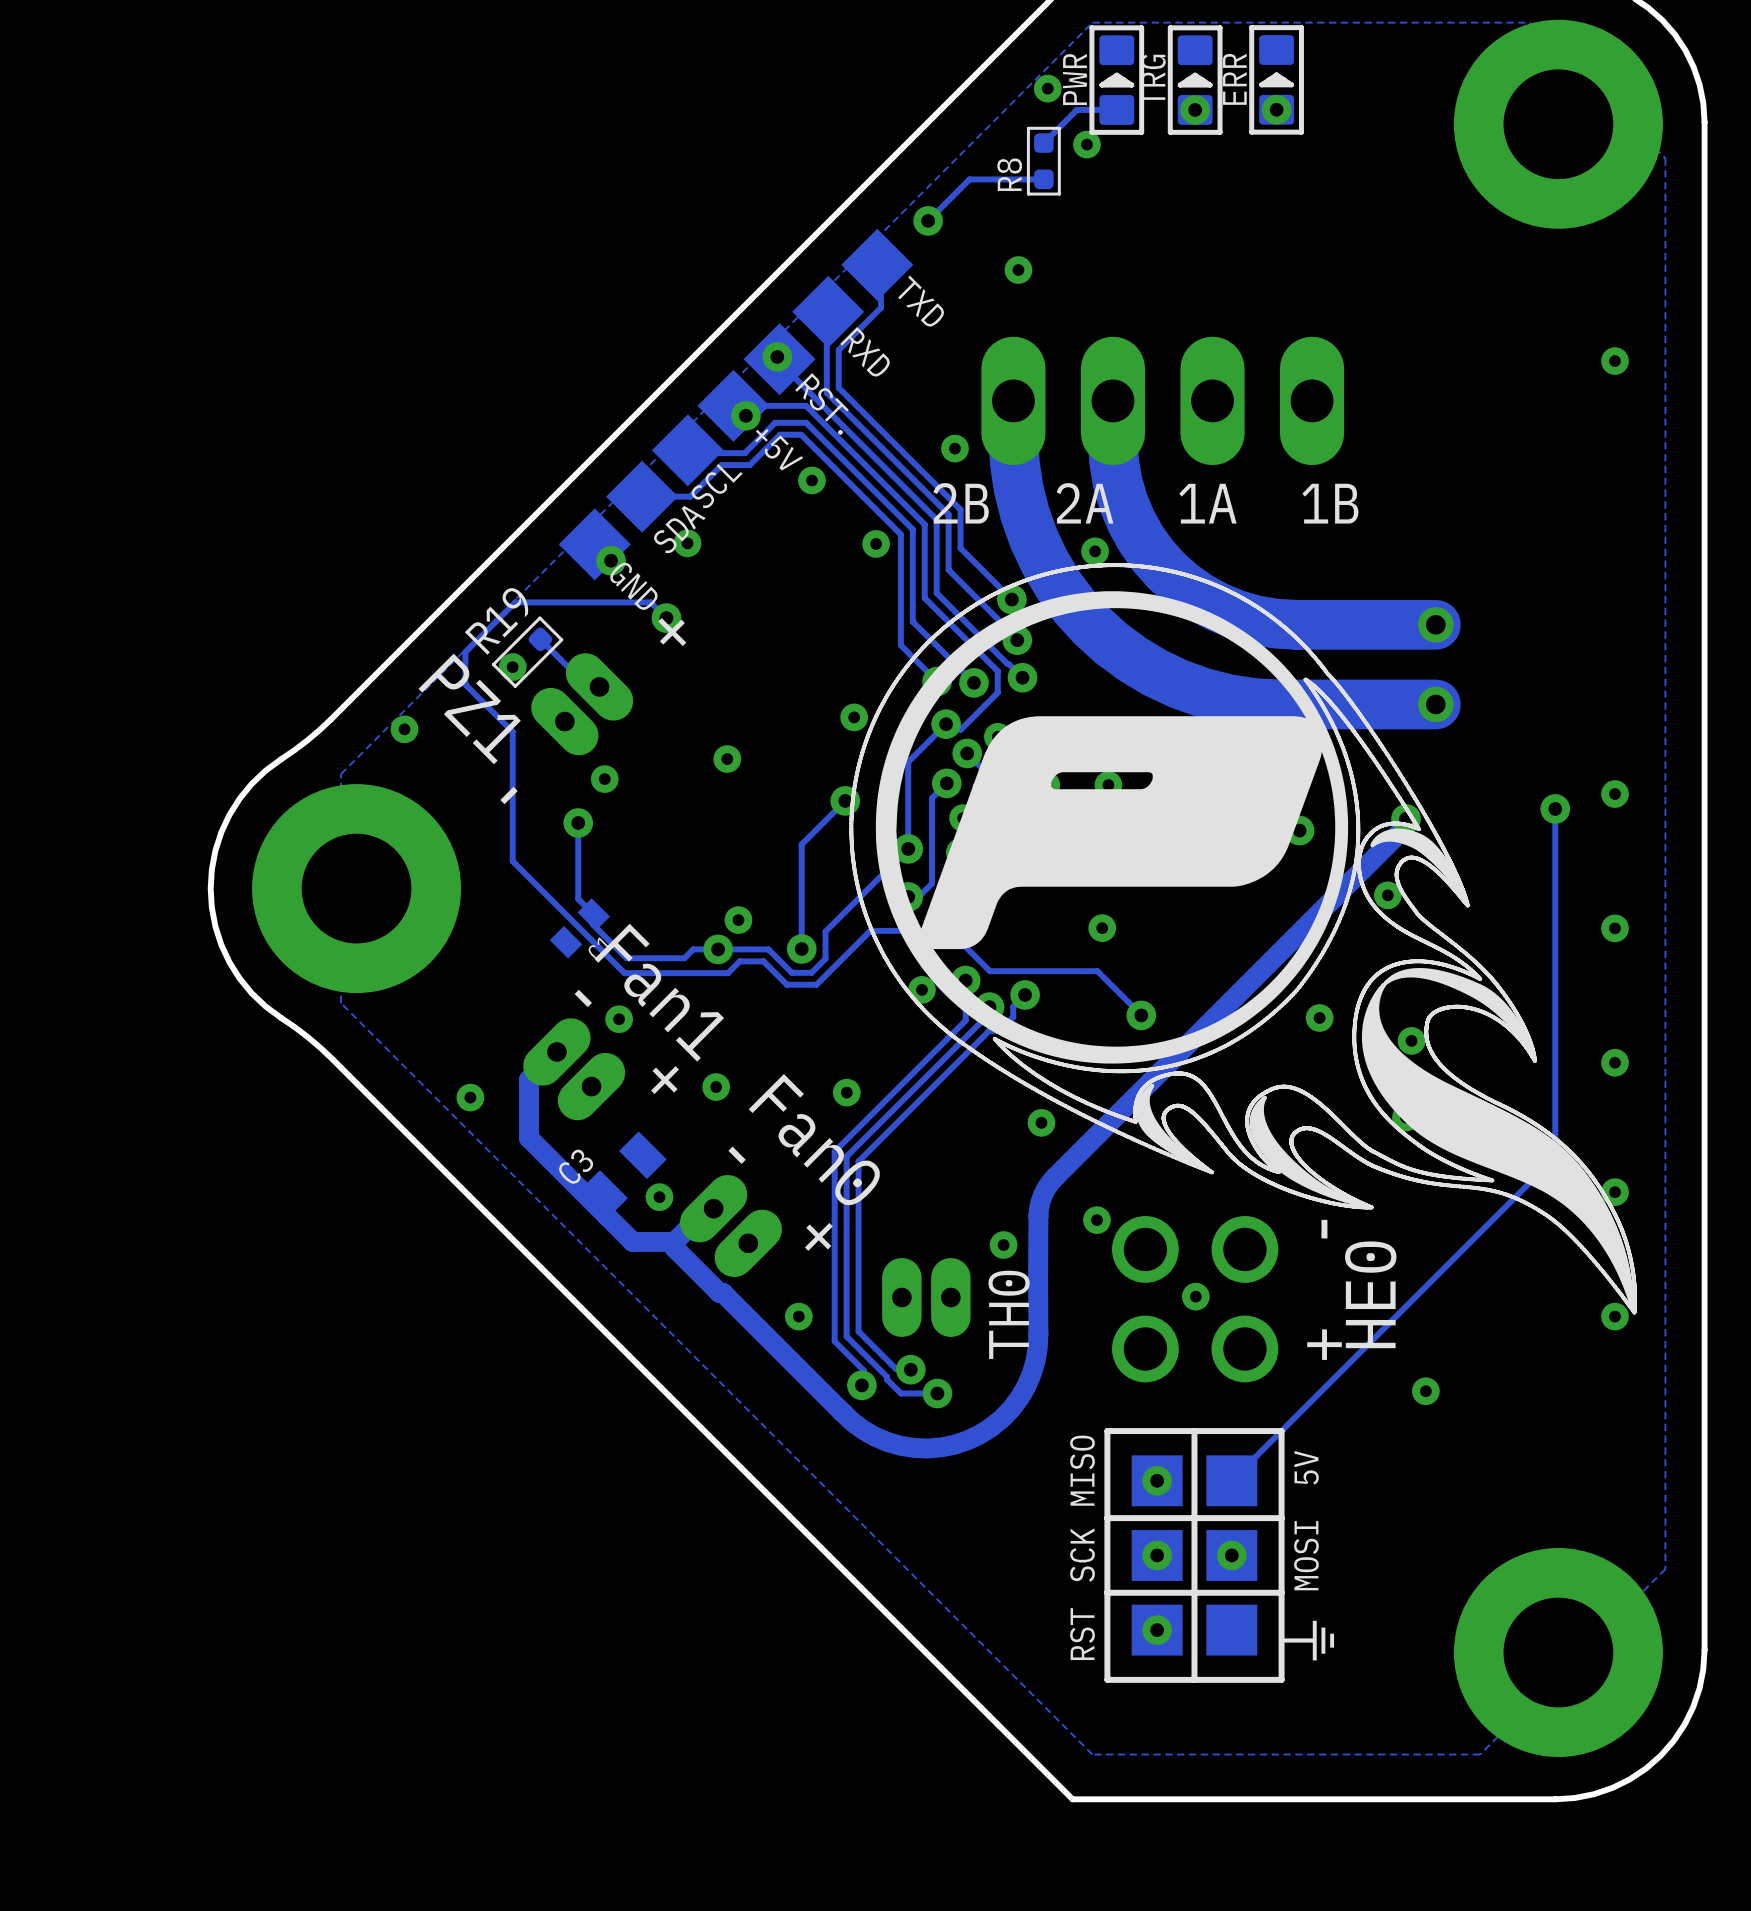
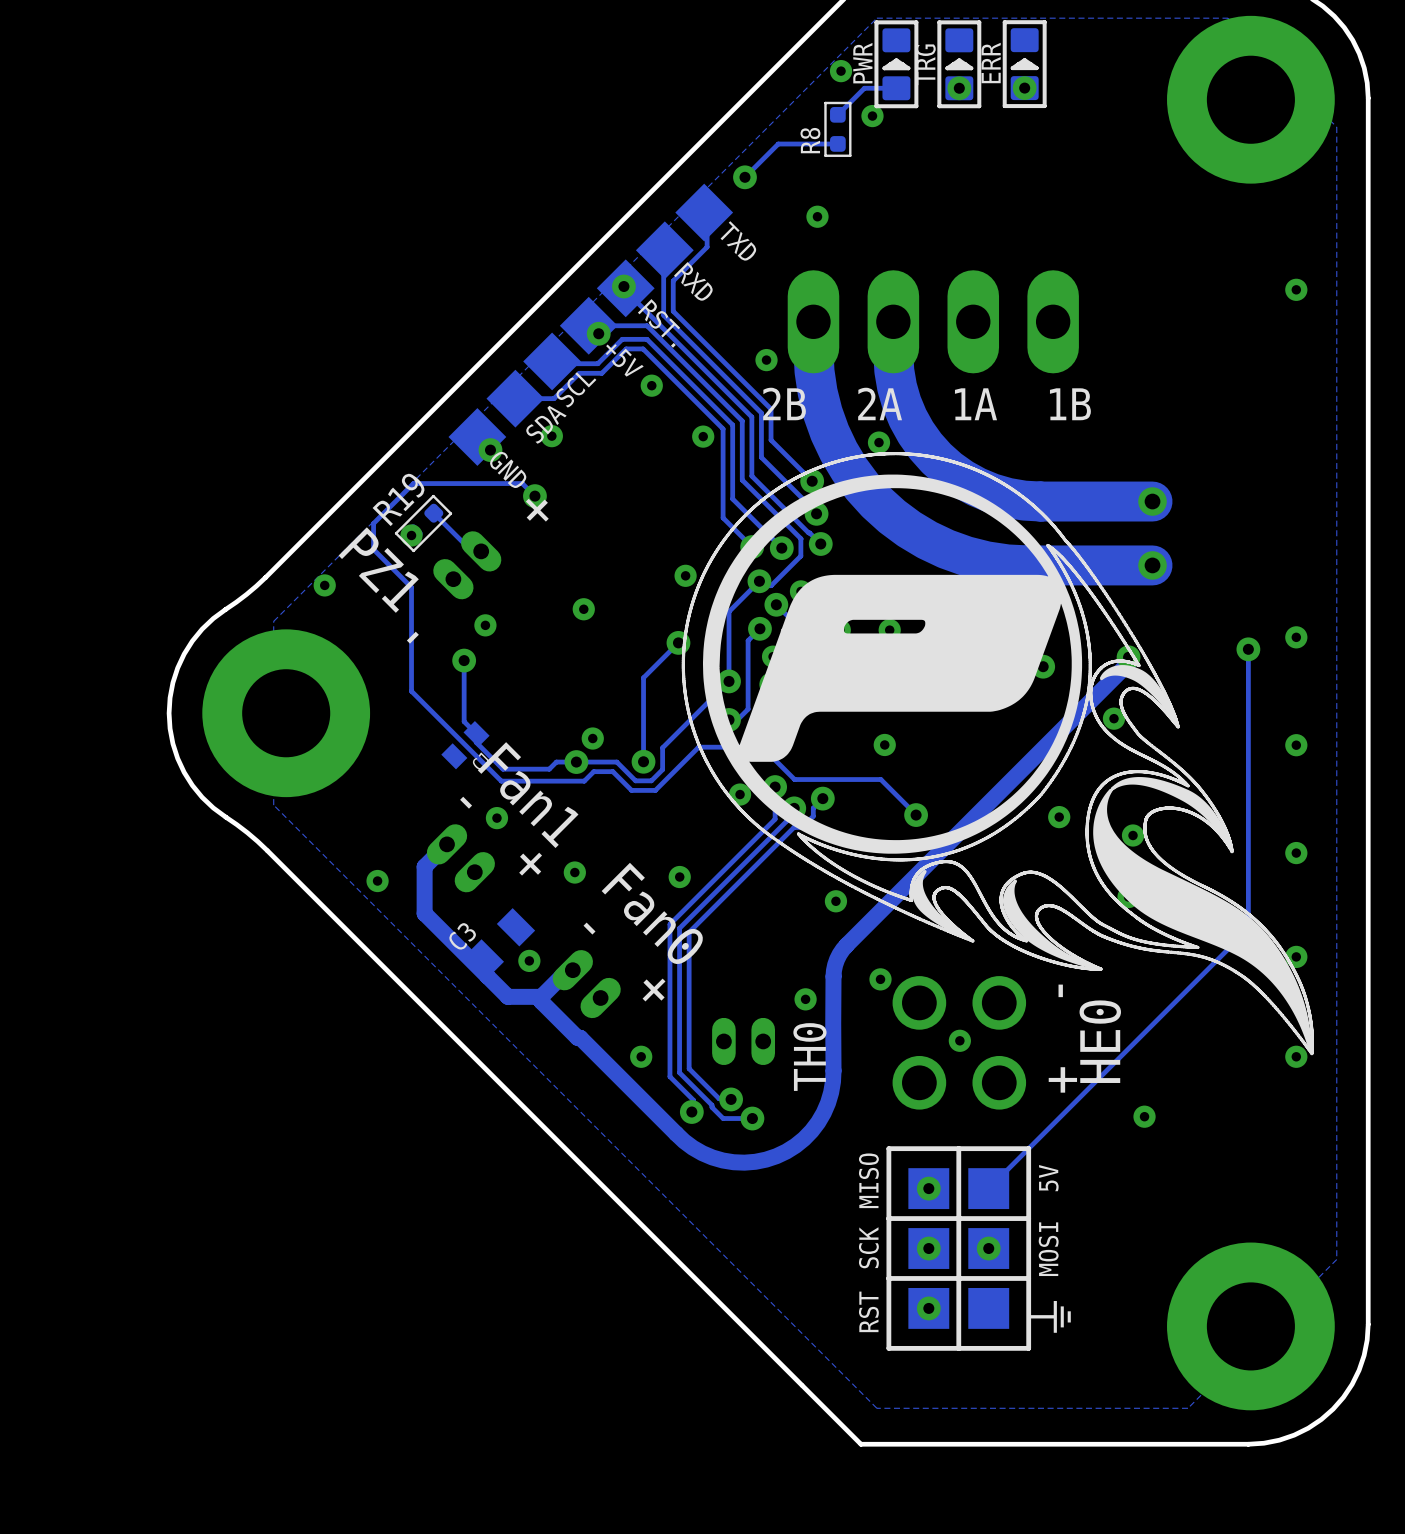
part footprint: [531, 653, 634, 756] -> [433, 531, 502, 600]
part footprint: [523, 1018, 626, 1121] -> [426, 824, 495, 893]
part footprint: [679, 1174, 783, 1278] -> [552, 950, 621, 1019]
part footprint: [882, 1257, 971, 1337] -> [712, 1017, 776, 1066]

